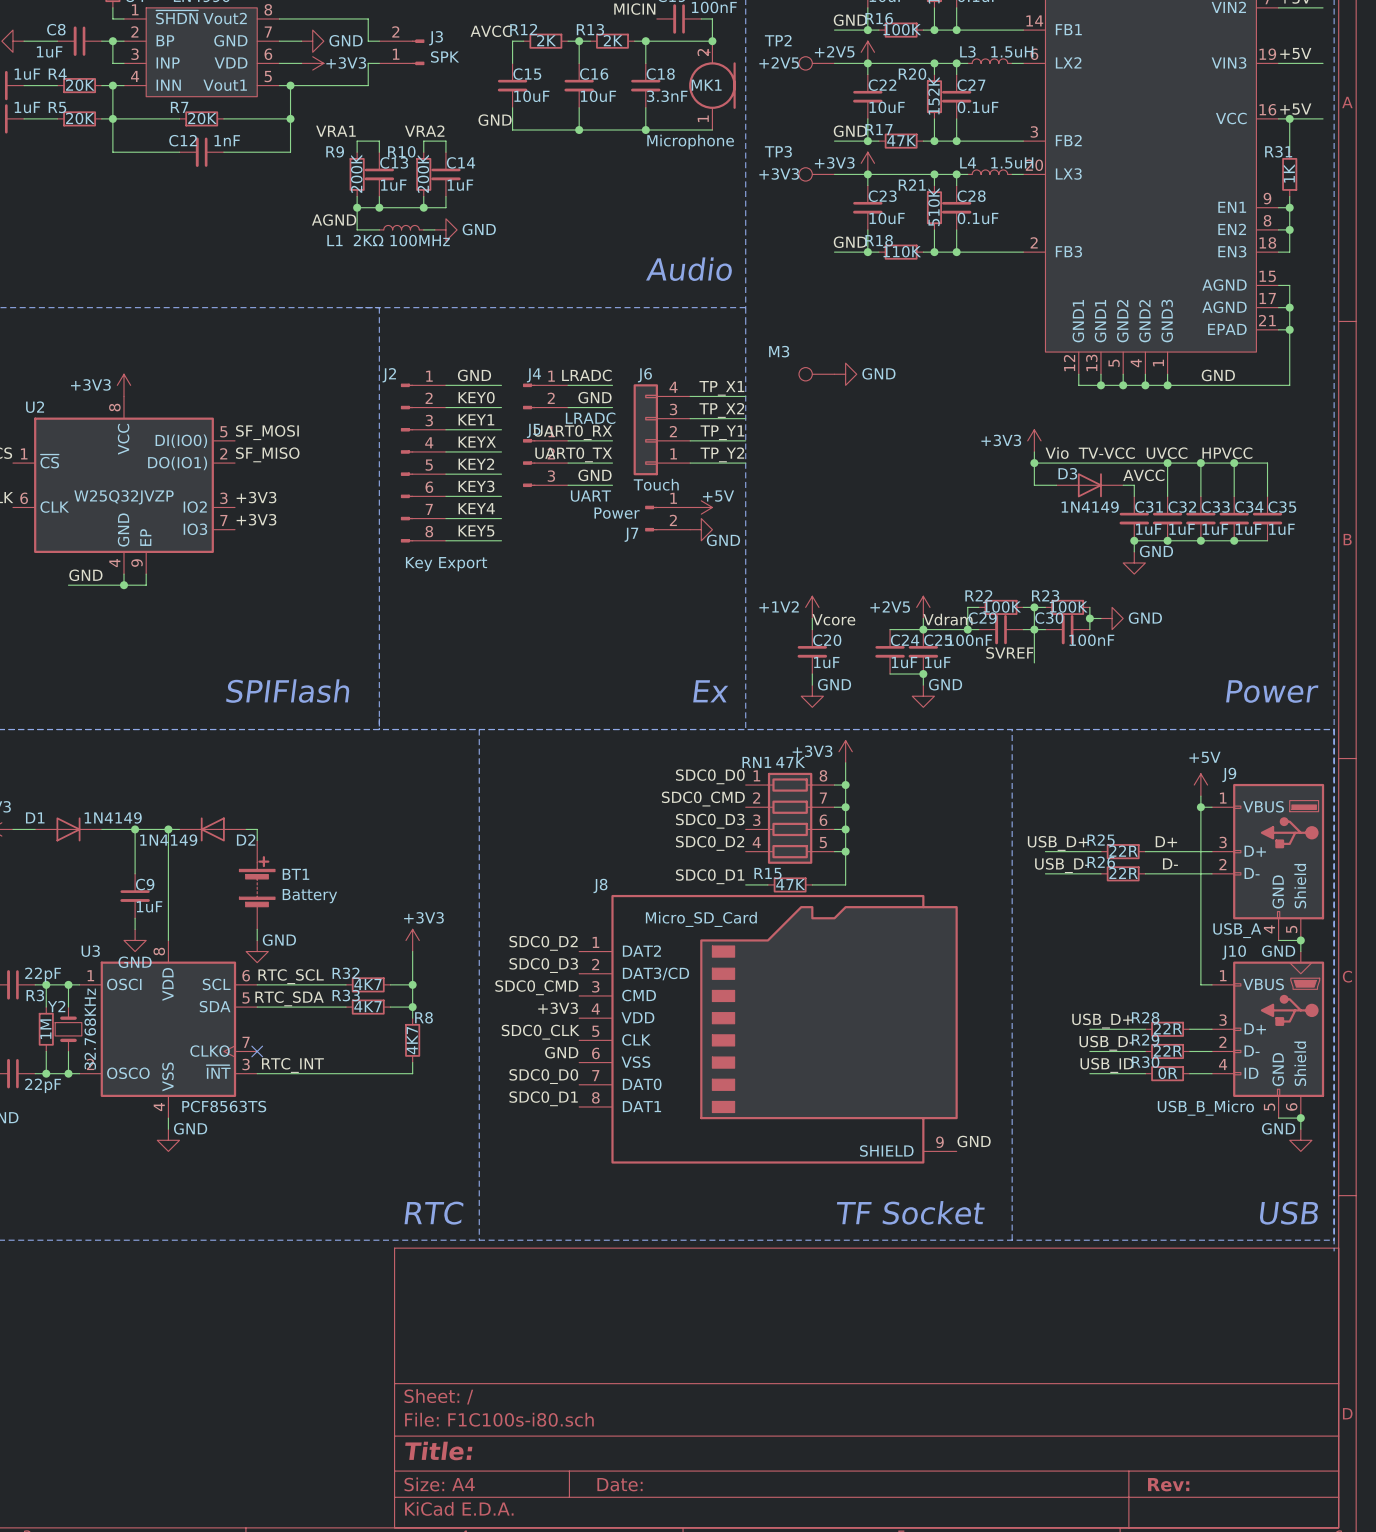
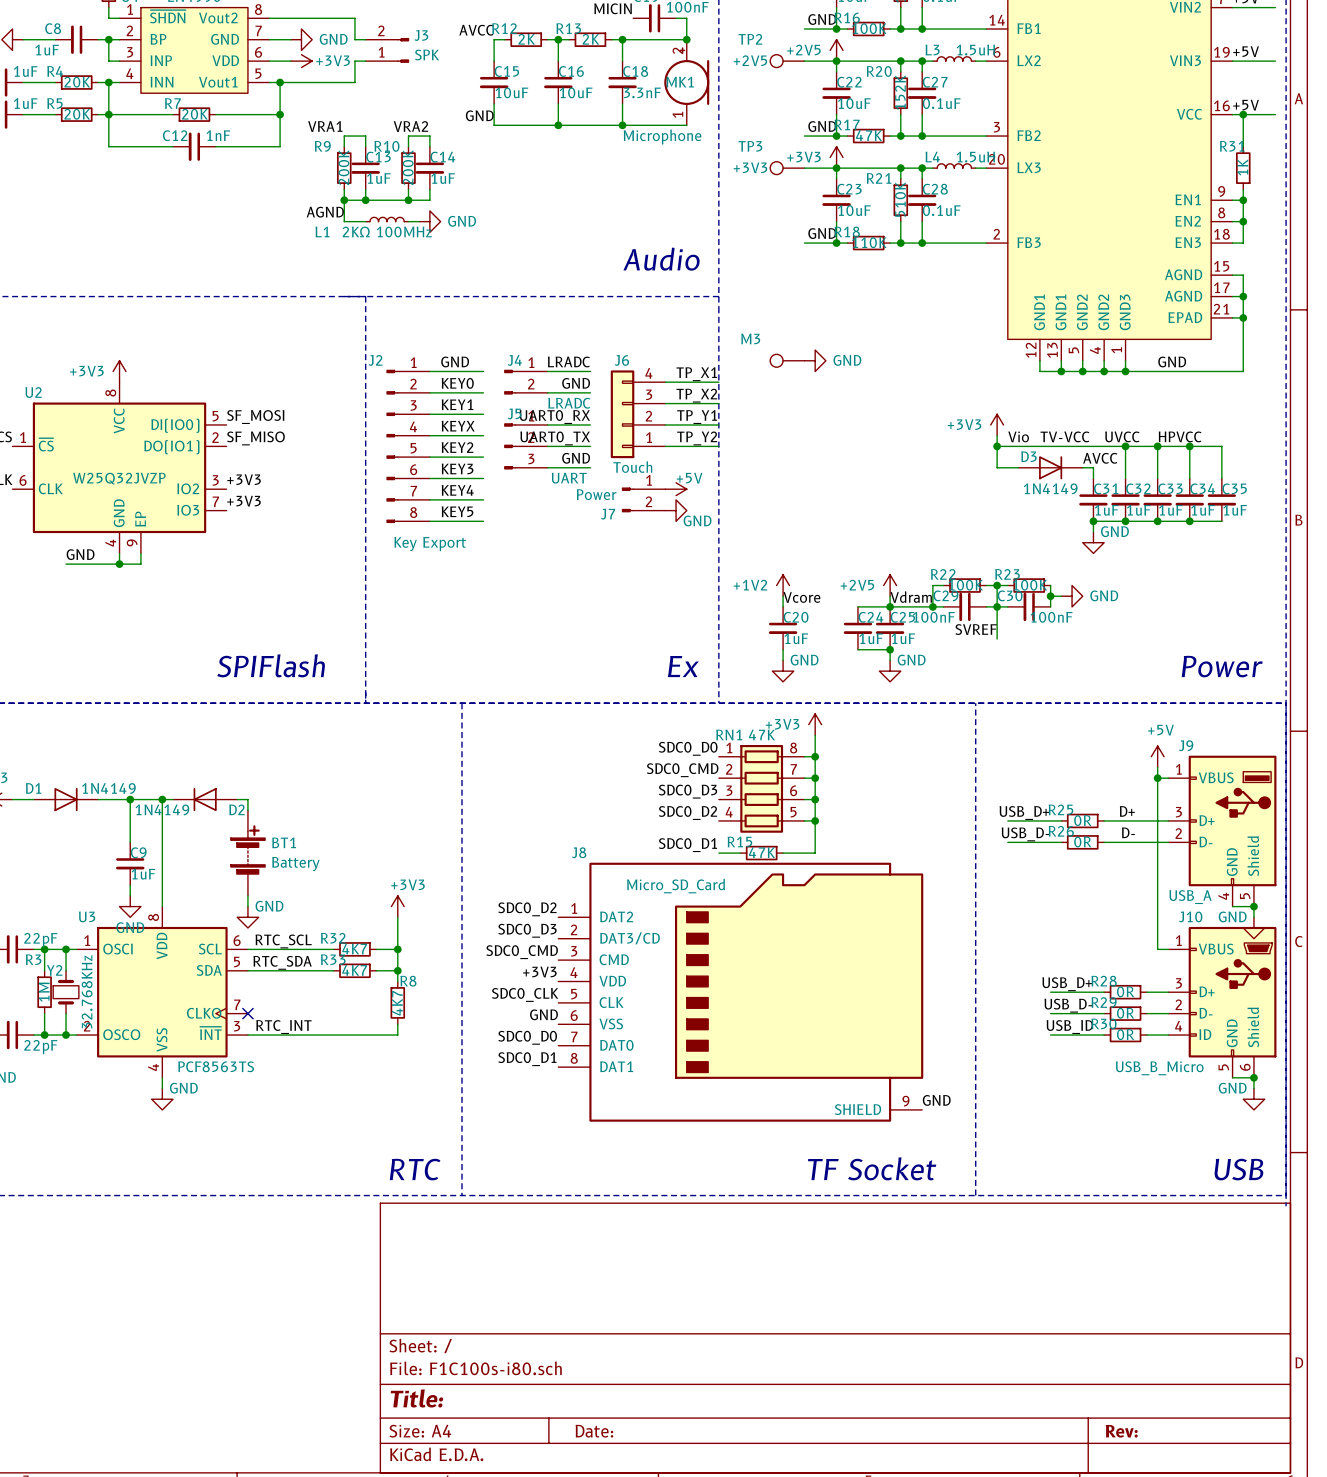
R25 value: 22R (1123, 851) -> 0R (1082, 820)
R26 value: 22R (1123, 873) -> 0R (1082, 842)
R28 value: 22R (1167, 1028) -> 0R (1125, 991)
R29 value: 22R (1167, 1050) -> 0R (1125, 1013)

